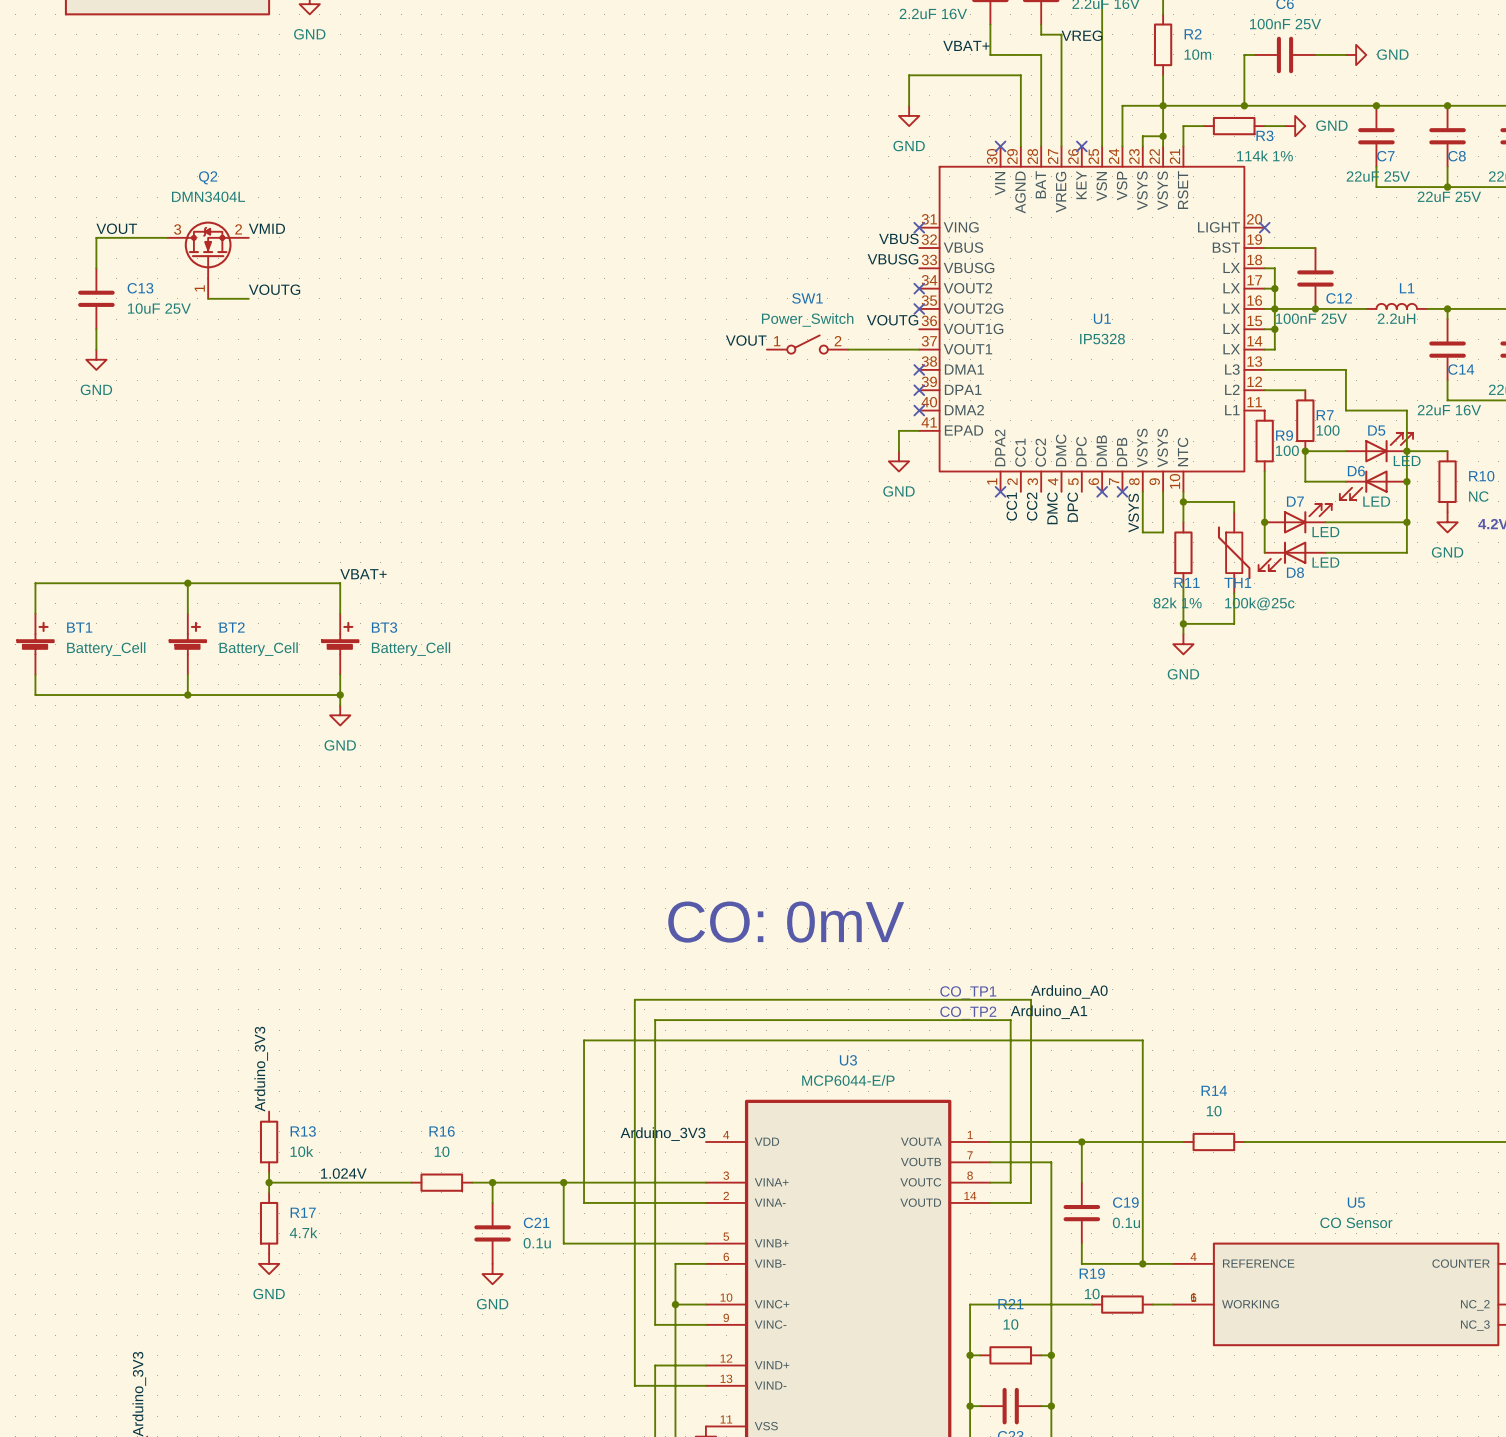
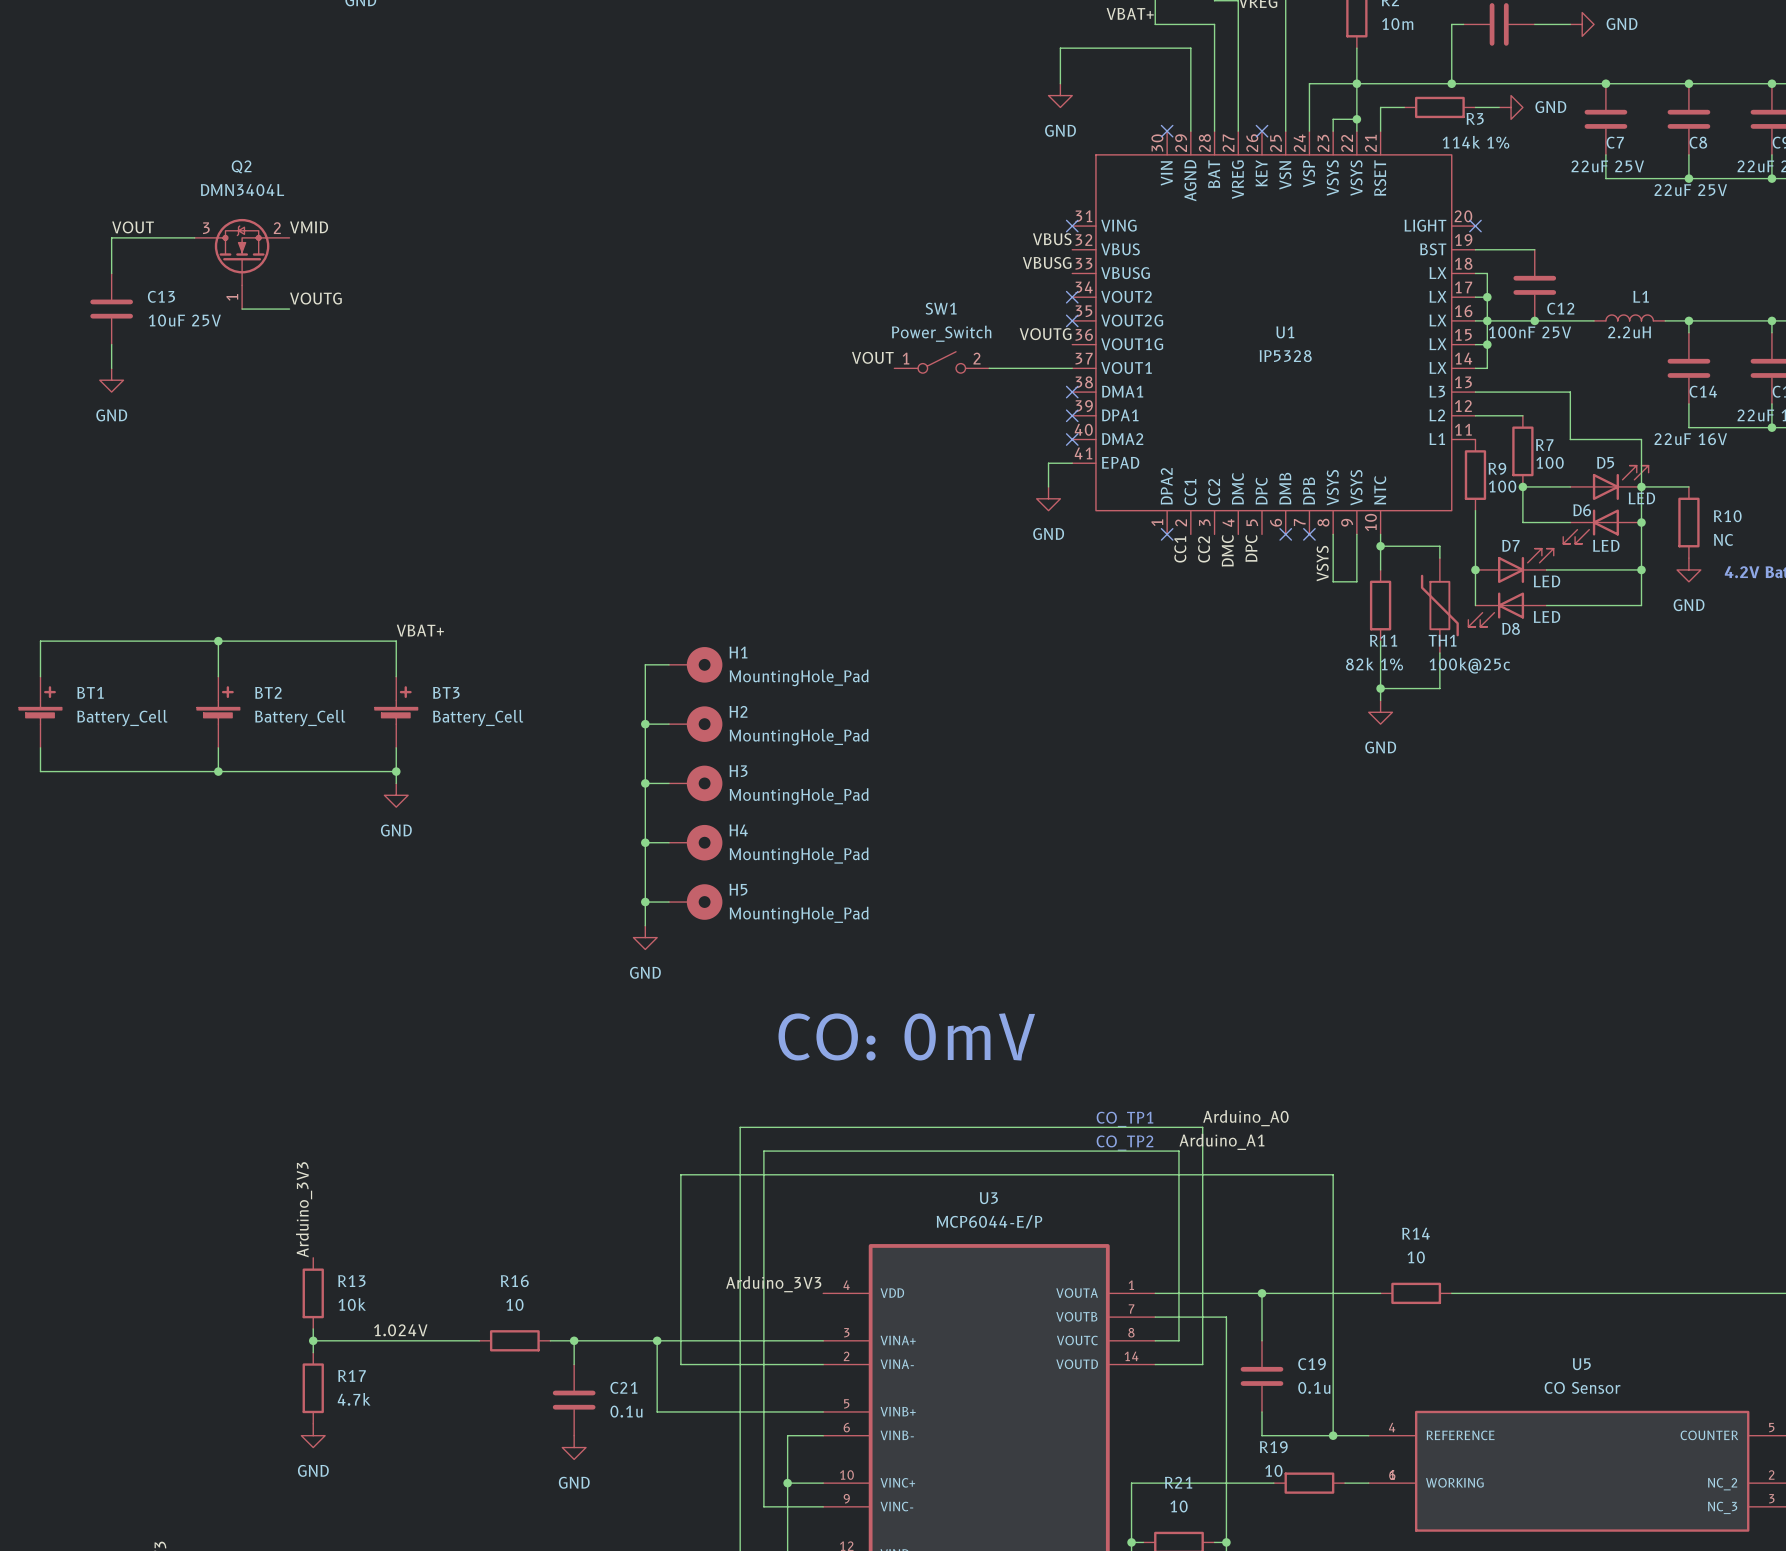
wire: none -> (669, 664) (645, 664) (645, 925)
H1: none -> MountingHole_Pad (695, 664)
wire: none -> (645, 724) (669, 724)
junction: none -> (645, 724)
H2: none -> MountingHole_Pad (695, 724)
wire: none -> (645, 783) (669, 783)
junction: none -> (645, 783)
H3: none -> MountingHole_Pad (695, 783)
wire: none -> (645, 842) (669, 842)
junction: none -> (645, 842)
H4: none -> MountingHole_Pad (695, 842)
wire: none -> (645, 902) (669, 902)
junction: none -> (645, 902)
H5: none -> MountingHole_Pad (695, 902)
power symbol: none -> GND (645, 937)

